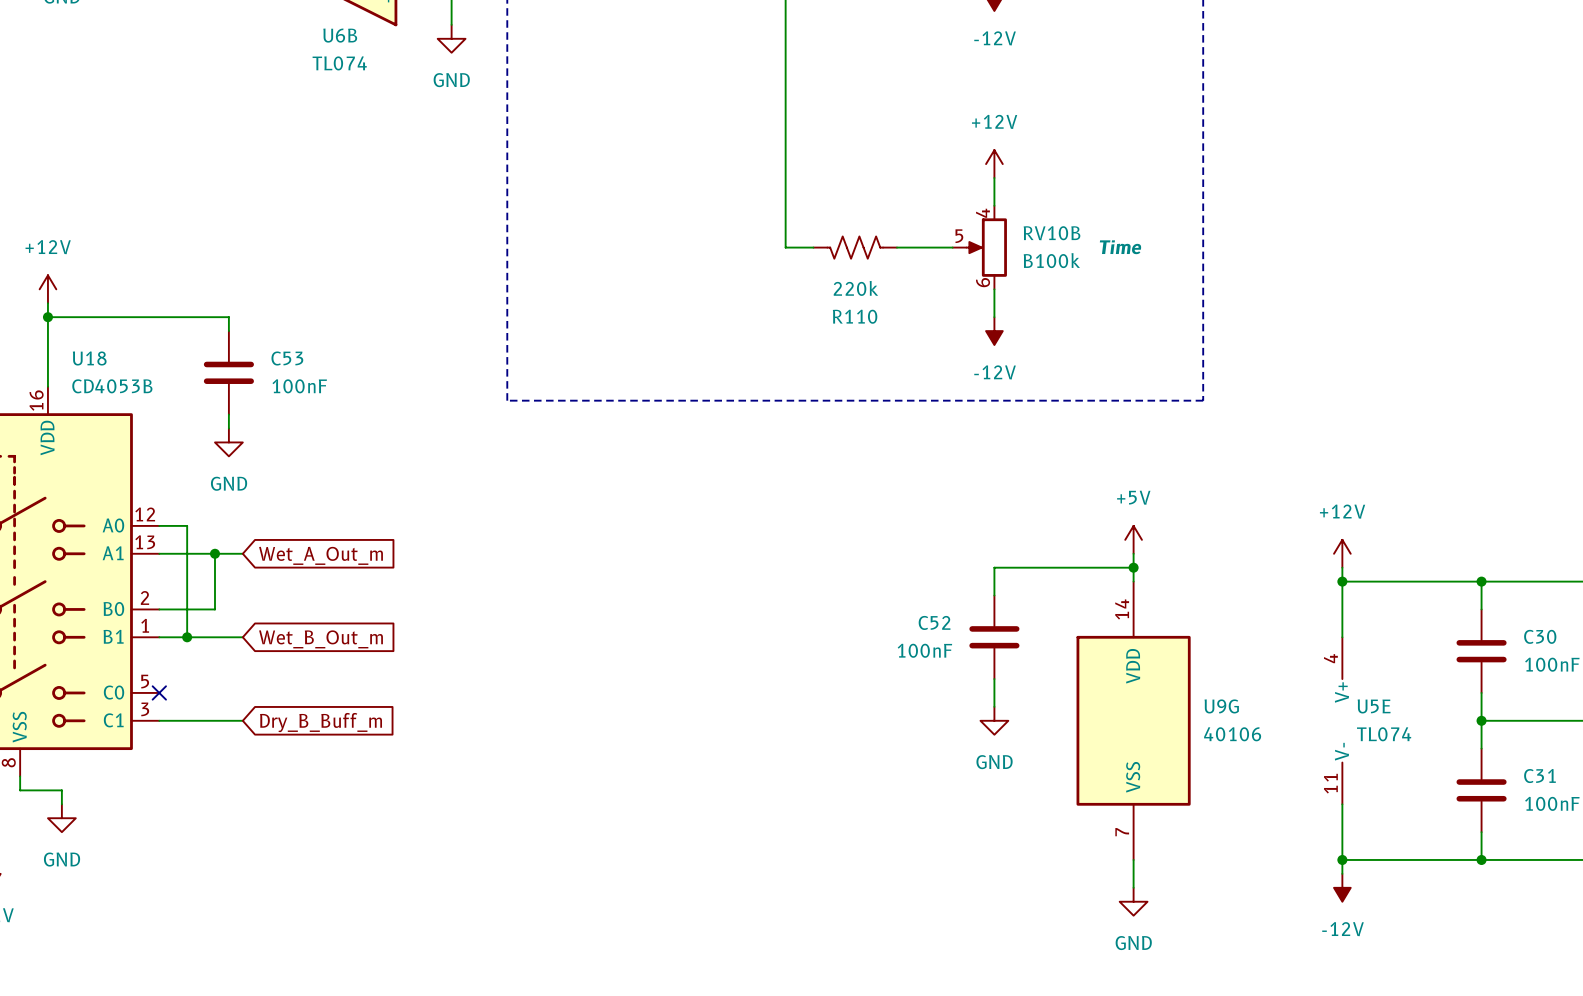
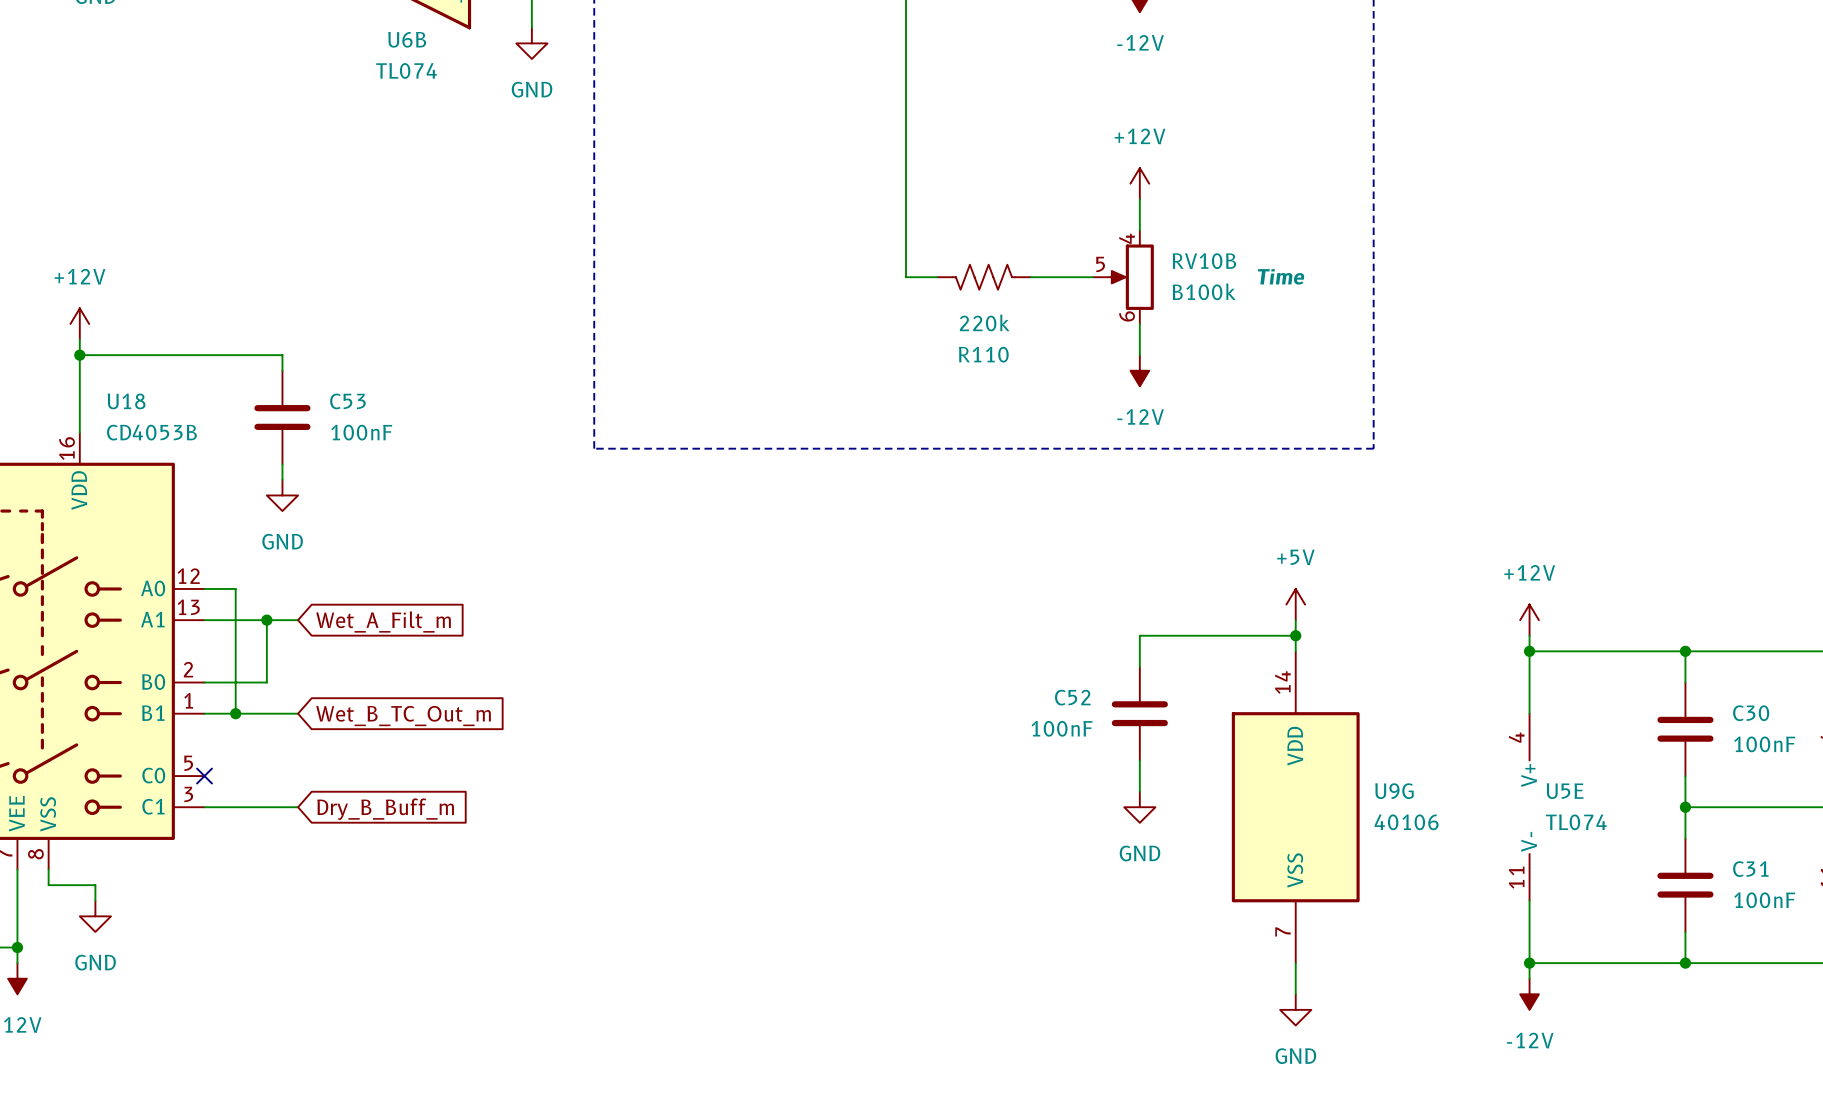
global label: Wet_A_Out_m (321, 555) -> Wet_A_Filt_m (383, 621)
global label: Wet_B_Out_m (321, 639) -> Wet_B_TC_Out_m (403, 716)

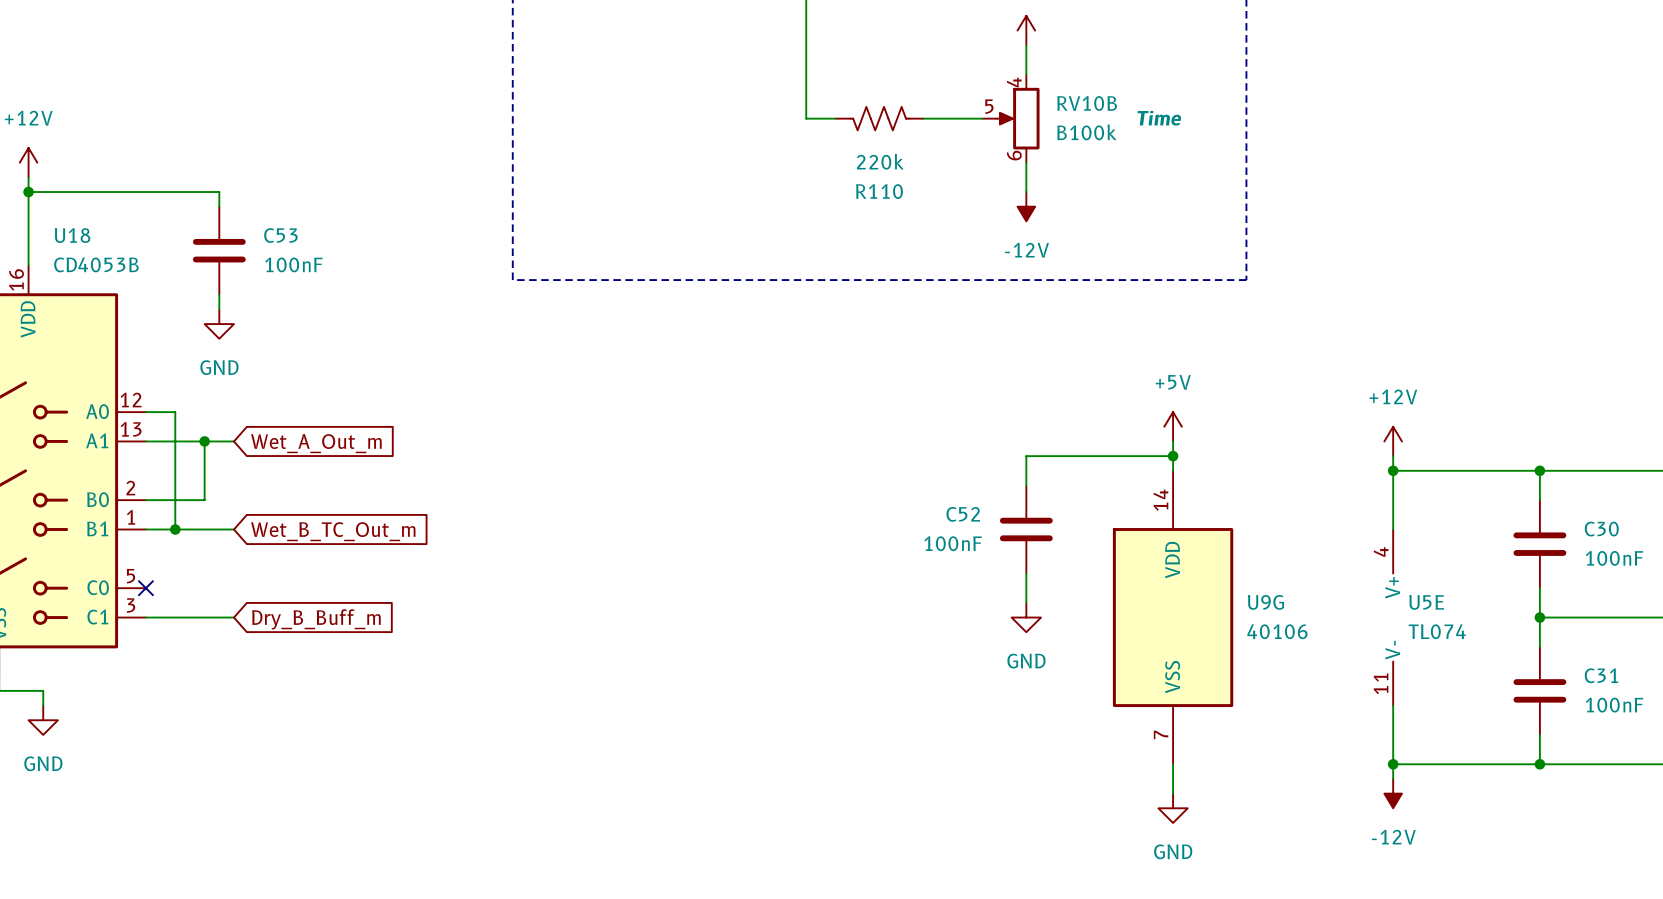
global label: Wet_A_Filt_m (383, 621) -> Wet_A_Out_m (316, 443)

